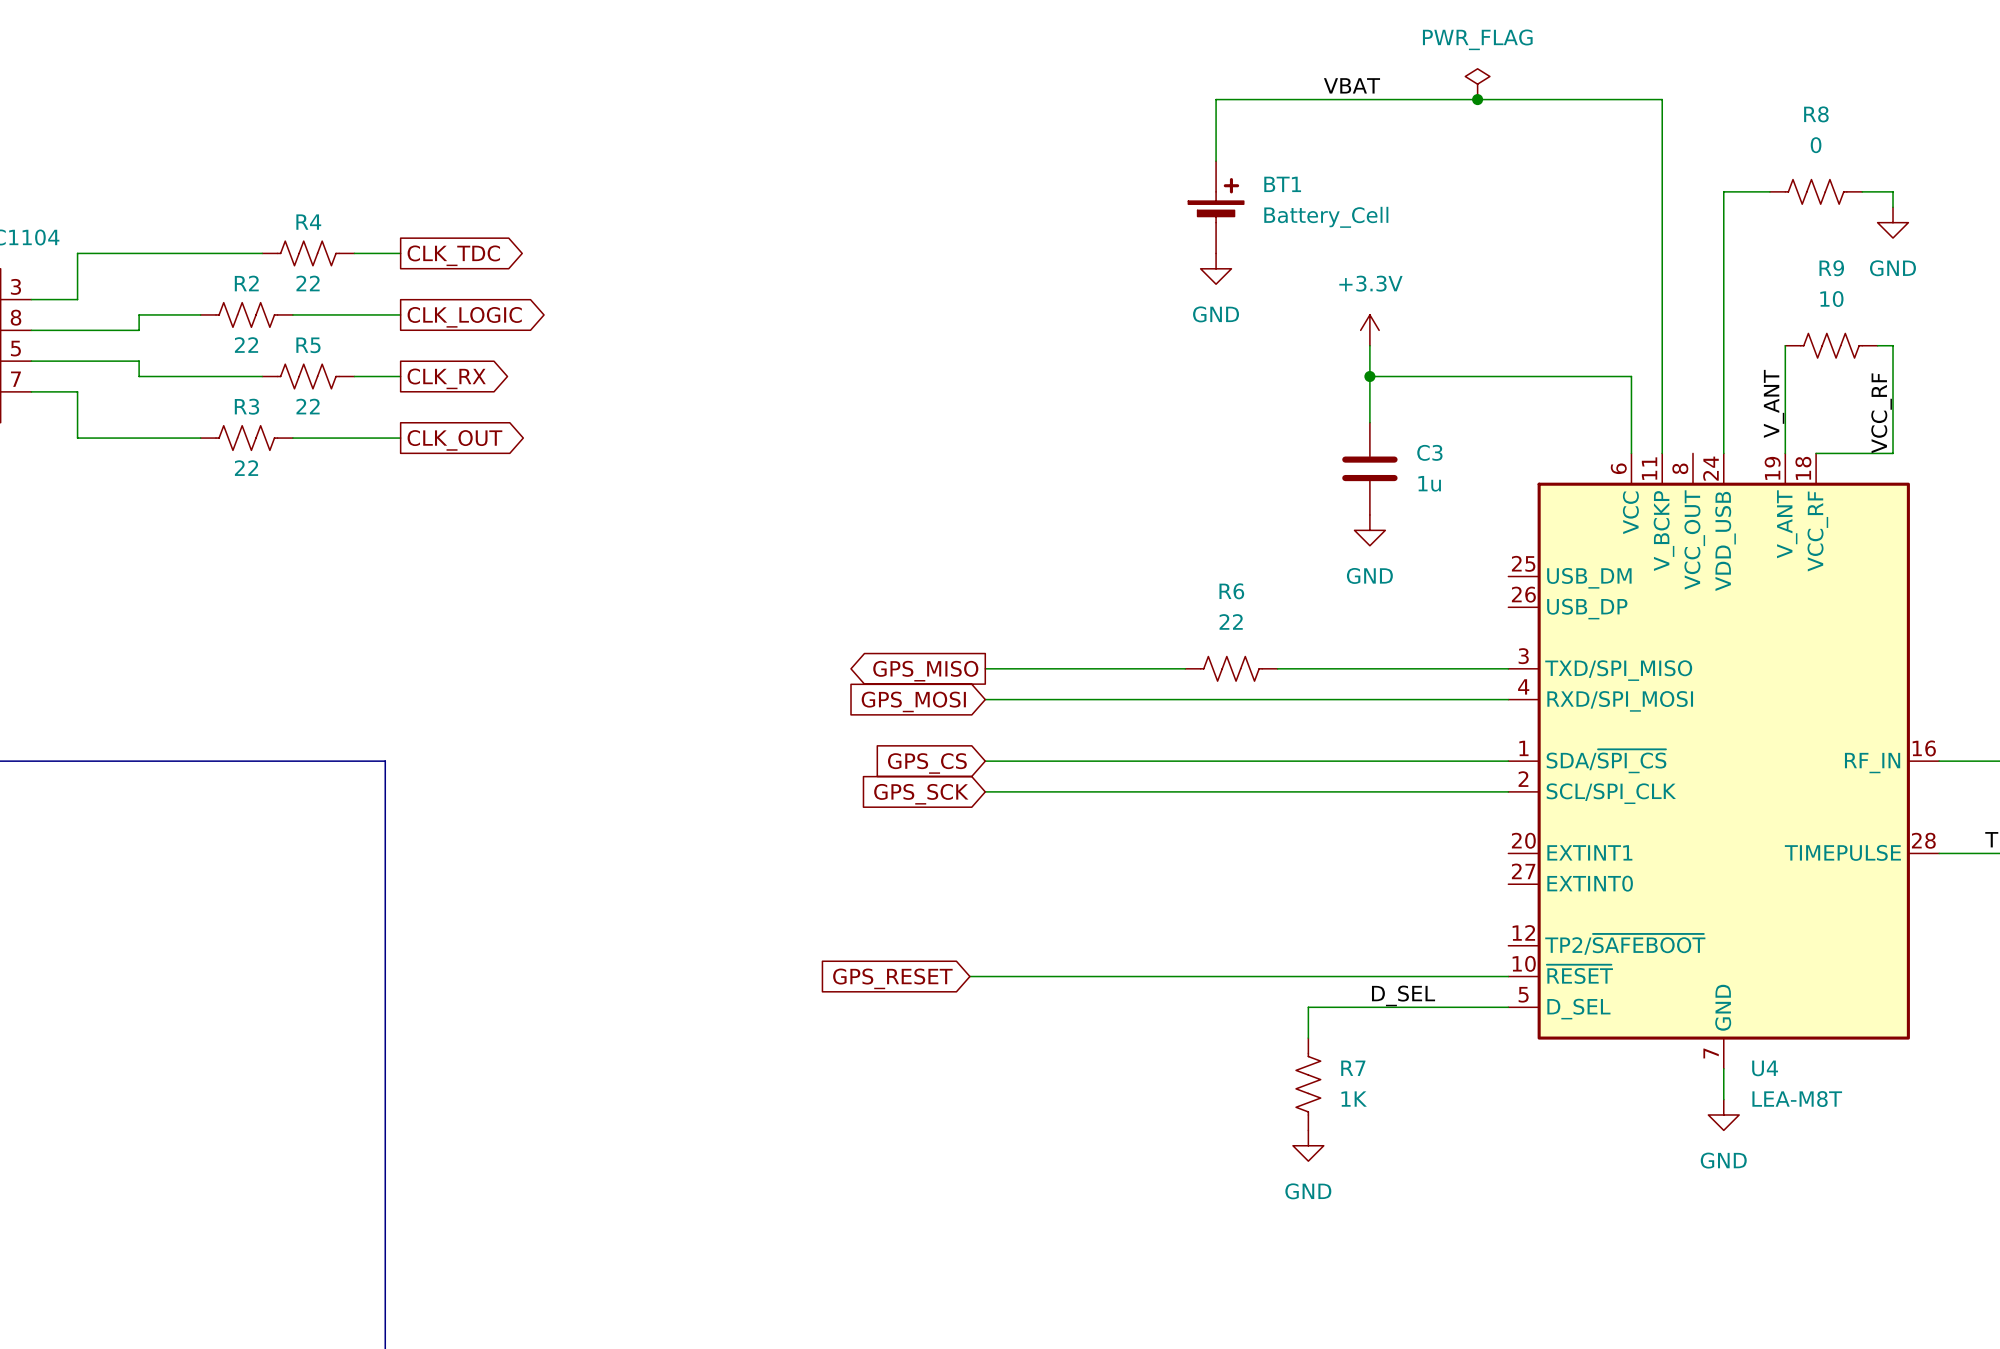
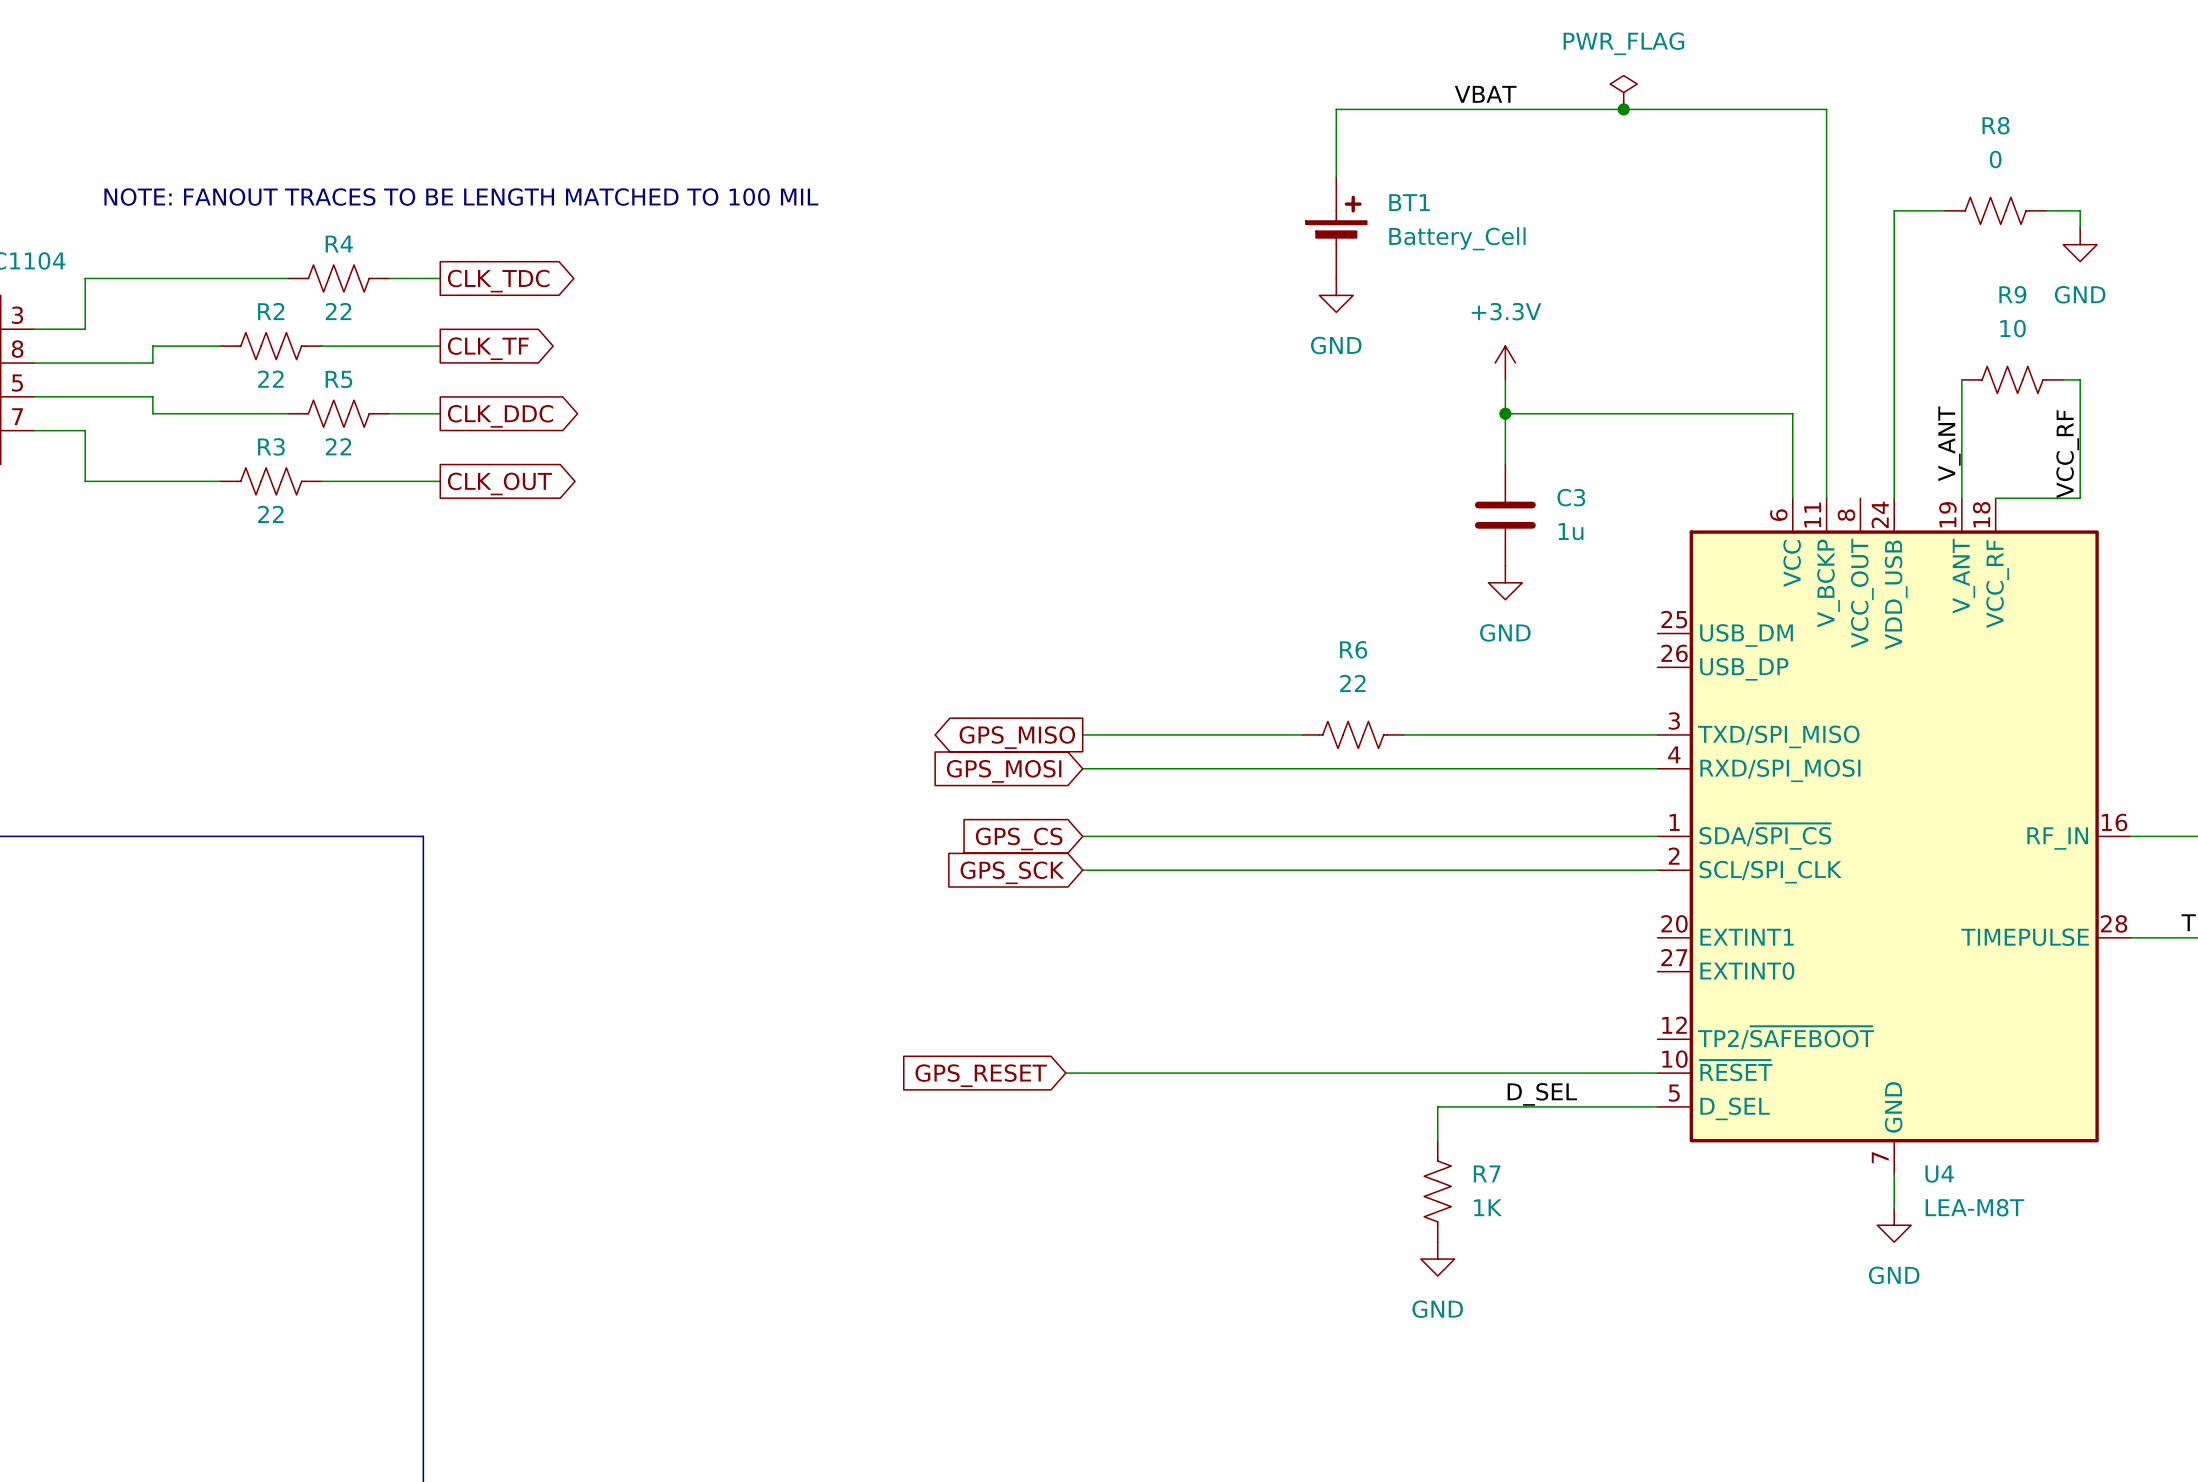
text: none -> NOTE: FANOUT TRACES TO BE LENGTH MATCHED TO 100 MIL (461, 197)
global label: CLK_LOGIC (464, 317) -> CLK_TF (488, 348)
global label: CLK_RX (446, 378) -> CLK_DDC (500, 416)

